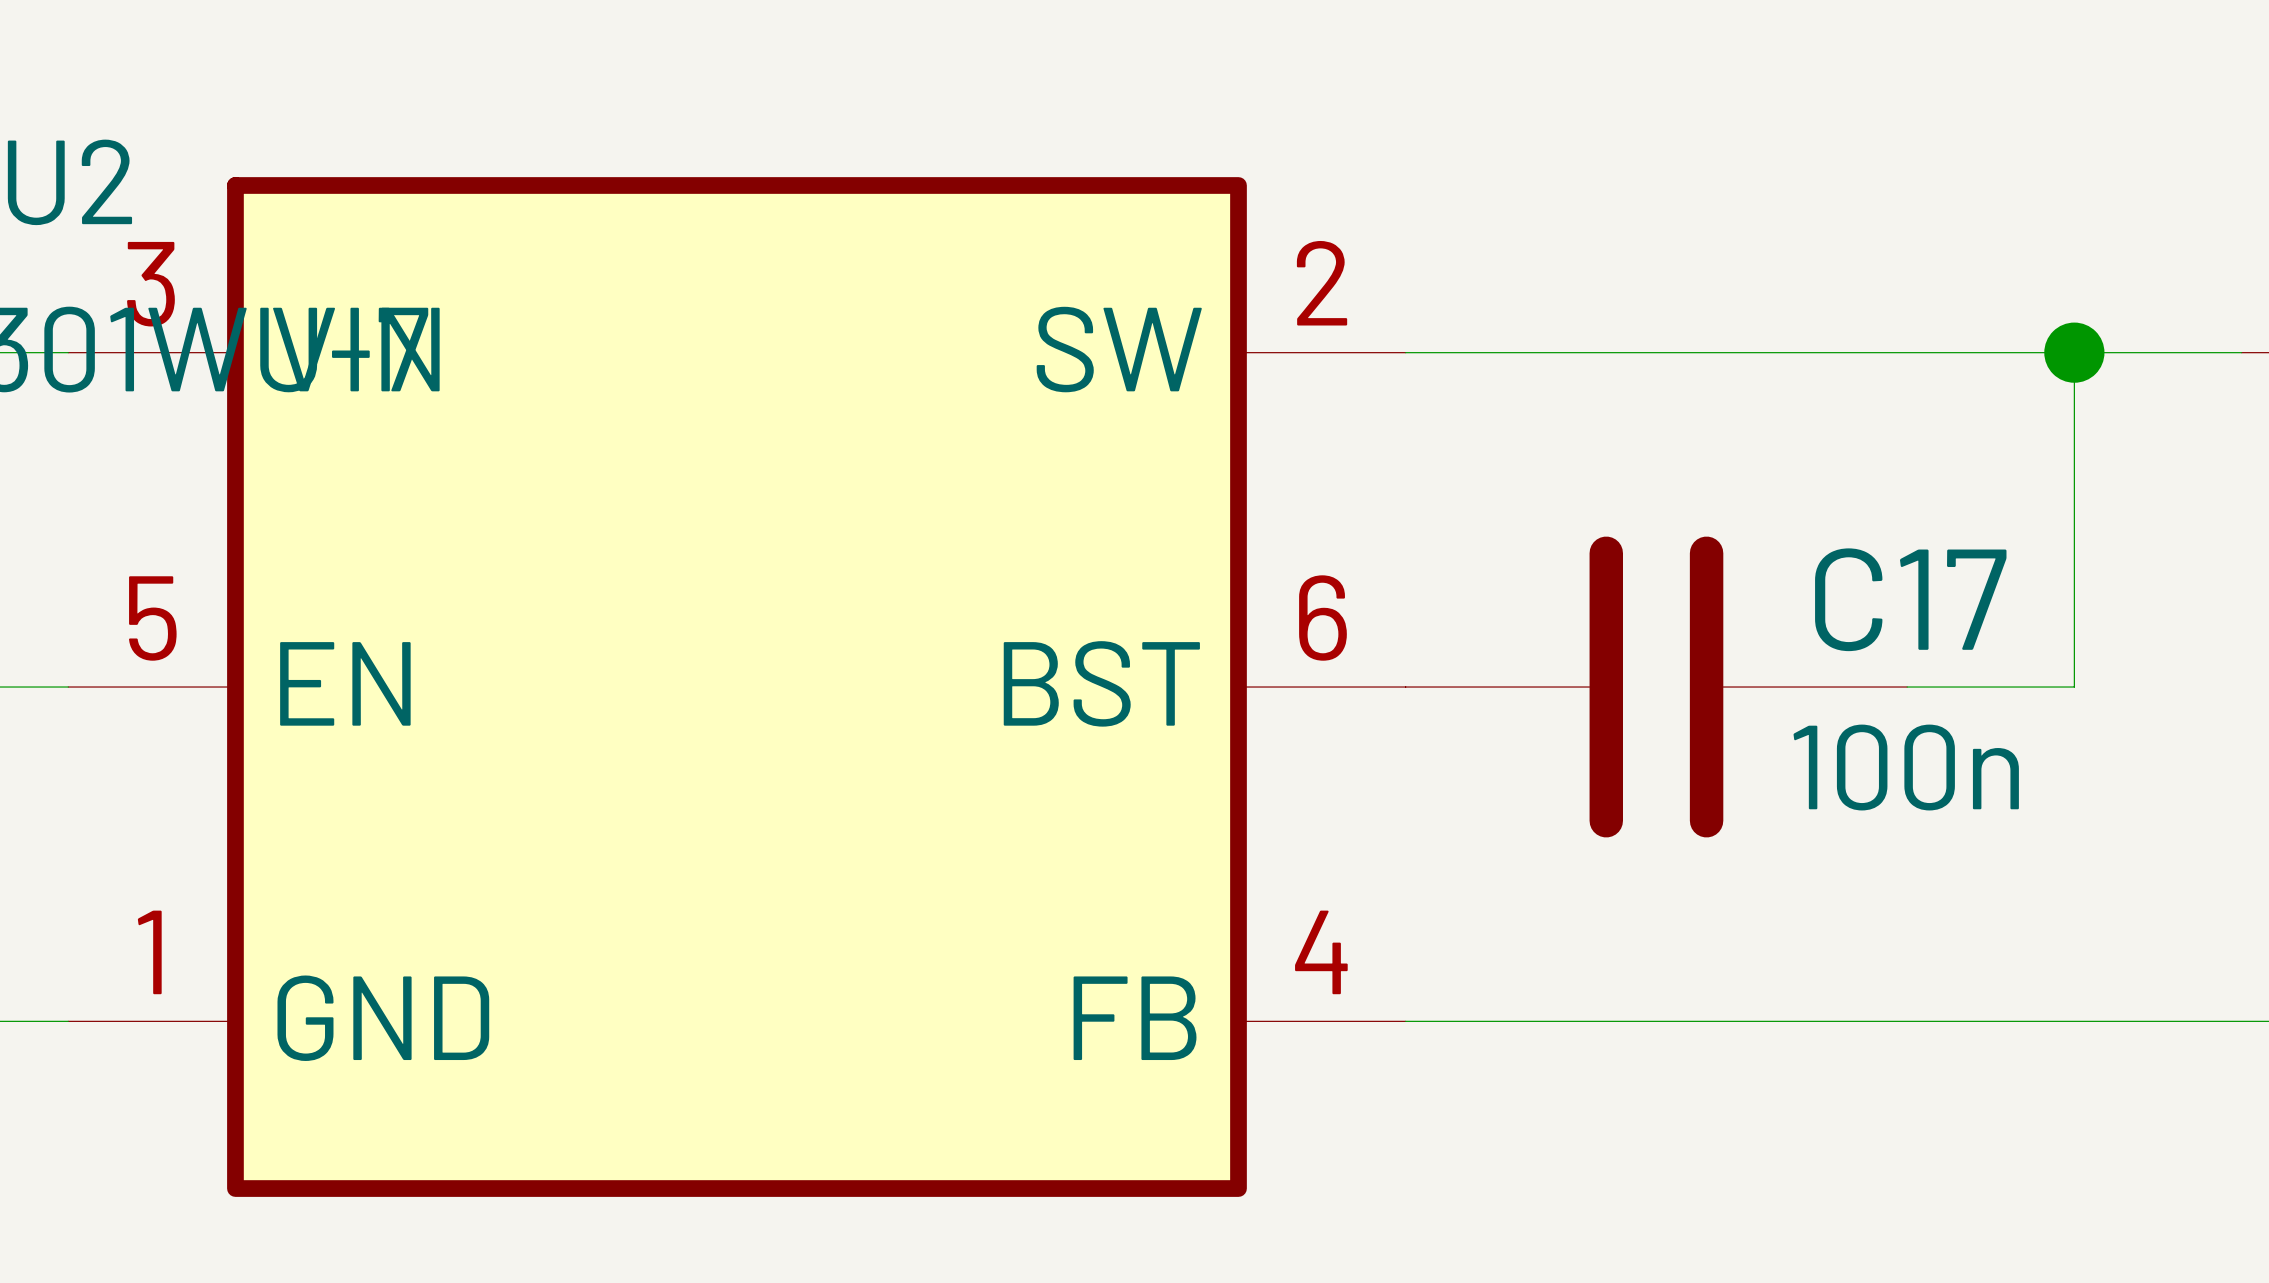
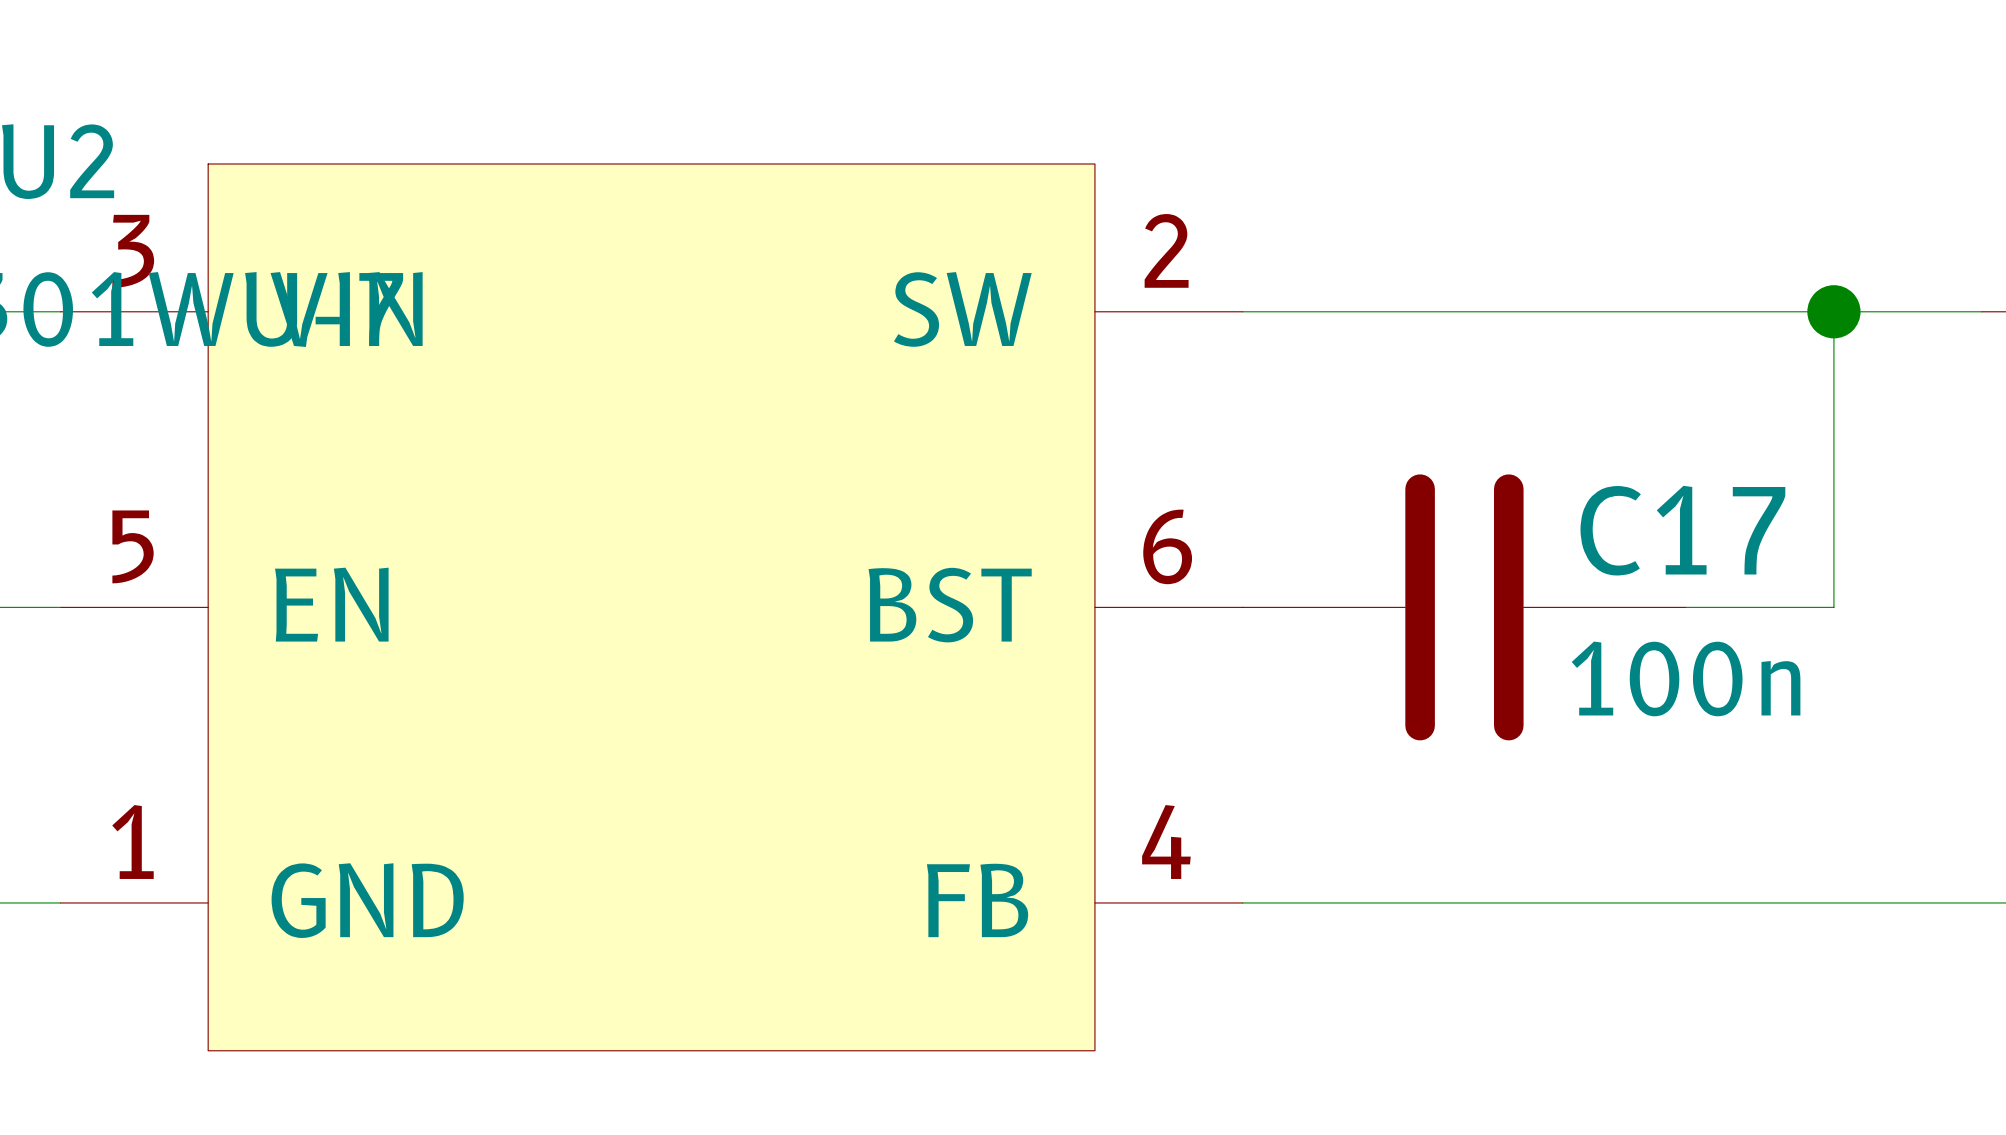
U2 symbol: [68, 177, 1406, 1197] -> [60, 163, 1243, 1051]

